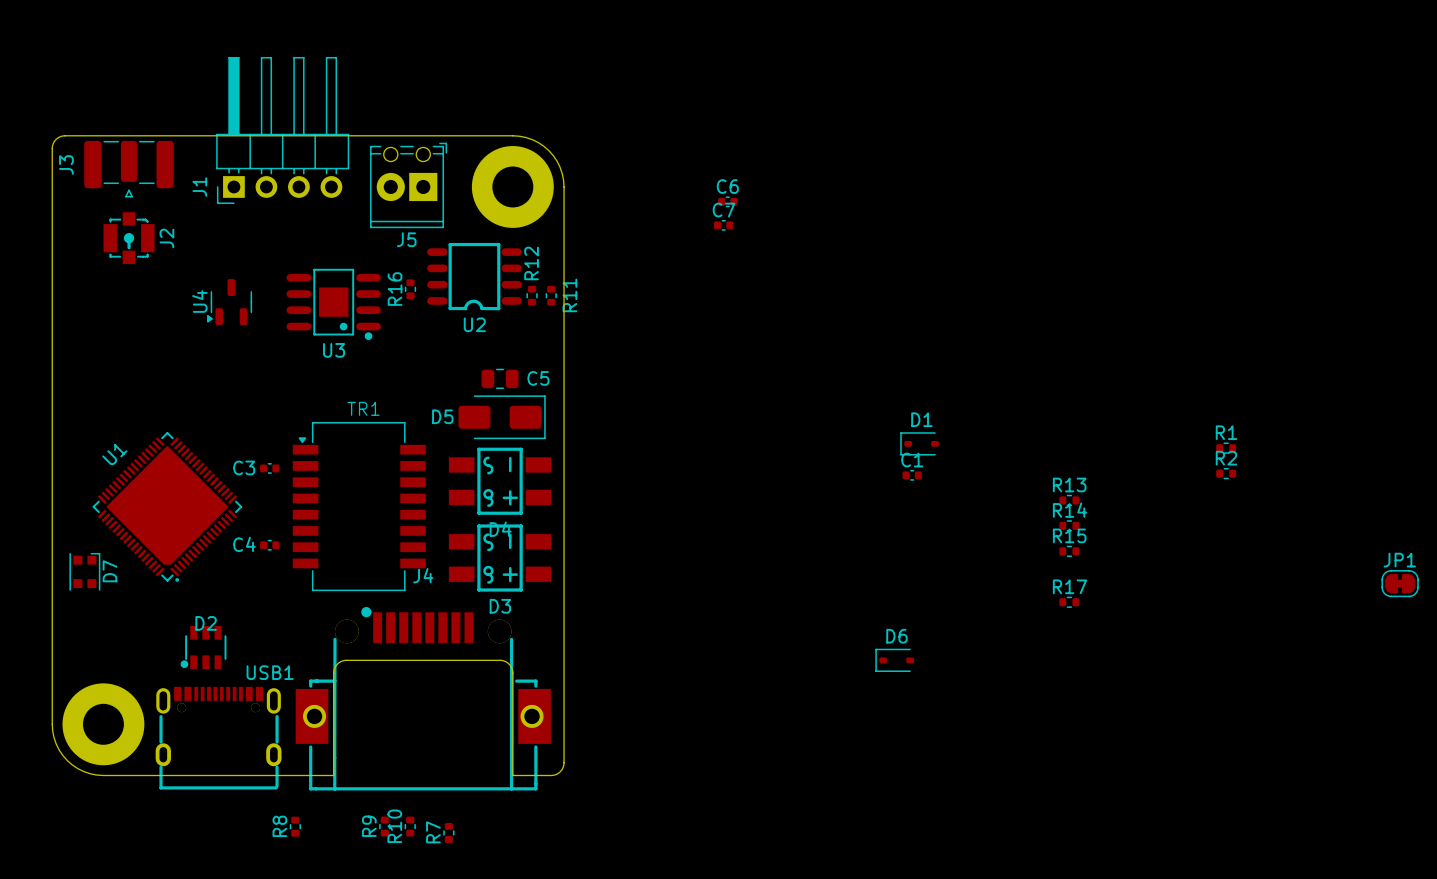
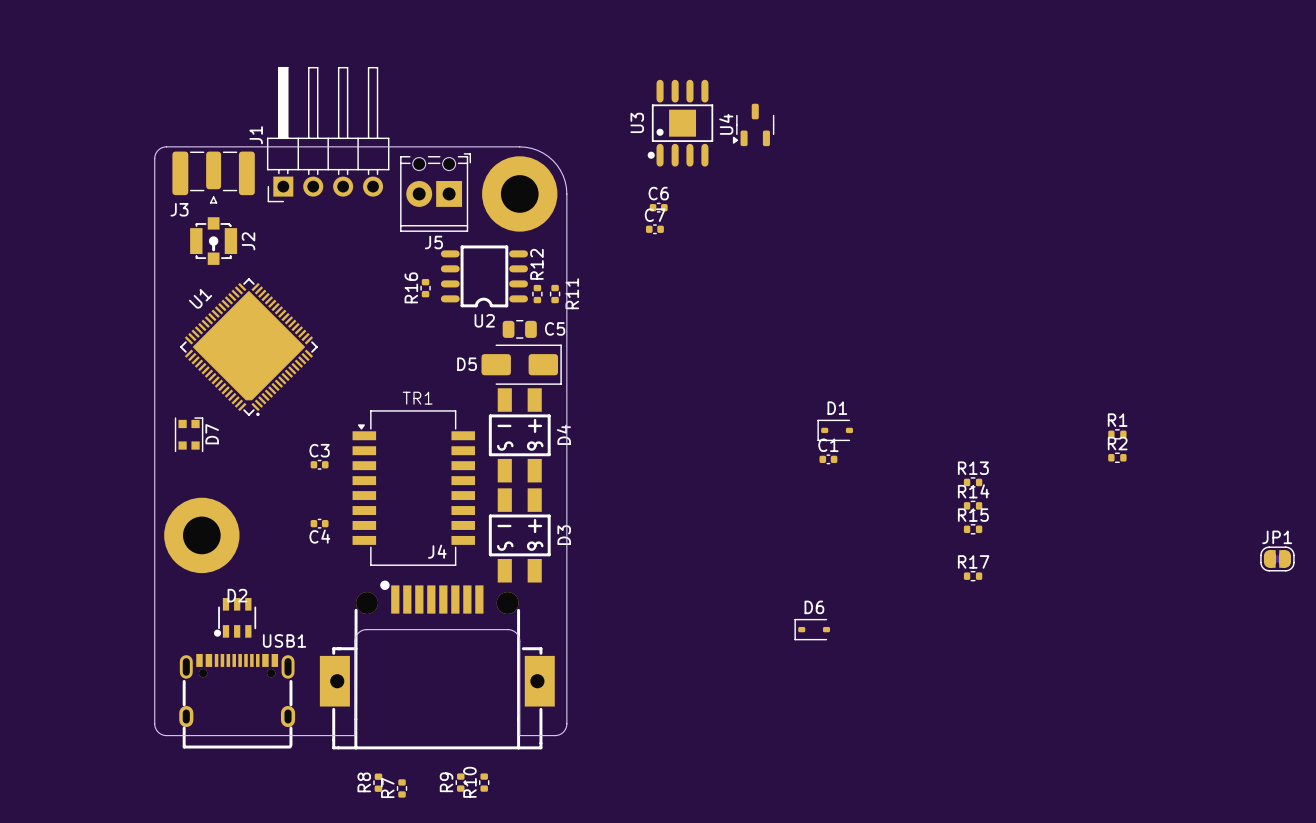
J1 position: (282, 130) -> (328, 134)
board edge: (192, 135) (63, 135) (56, 139) (52, 148) (52, 724) (54, 737) (59, 749) (67, 760) (77, 768) (90, 773) (103, 775) (192, 775) -> (166, 146) (158, 150) (154, 158) (154, 723) (158, 732) (166, 735)
board edge: (512, 135) (526, 137) (543, 146) (557, 161) (563, 180) (564, 762) (562, 769) (556, 774) (512, 775) (512, 671) (508, 663) (500, 660) -> (460, 146) (519, 146) (537, 150) (548, 156) (557, 165) (563, 175) (566, 187) (566, 723) (564, 731) (556, 735) (519, 735) (519, 641) (515, 632) (507, 629) (449, 629)
J3 name rotation: 0° (66, 165) -> 90° clockwise (179, 209)
J3 name position: J3 (66, 165) -> J3 (179, 209)
J3 position: (129, 169) -> (213, 177)
J5 position: (408, 185) -> (435, 192)
part position: (512, 186) -> (519, 193)
J1 name position: J1 (199, 187) -> J1 (256, 135)
J2 position: (129, 238) -> (213, 241)
U2 position: (474, 277) -> (484, 277)
R16 position: (410, 289) -> (425, 288)
R12 position: (532, 295) -> (537, 294)
R11 position: (551, 295) -> (555, 294)
U4 position: (229, 302) -> (753, 124)
U3 rotation: 0° (333, 304) -> 90° clockwise (680, 123)
U3 position: (333, 304) -> (680, 123)
C5 position: (500, 378) -> (519, 329)
D5 position: (502, 417) -> (521, 364)
C3 name position: C3 (244, 467) -> C3 (319, 450)
C3 position: (269, 468) -> (319, 464)
D4 rotation: 0° (500, 481) -> 90° counterclockwise (519, 435)
D4 position: (500, 481) -> (519, 435)
U1 position: (167, 506) -> (248, 347)
TR1 position: (359, 506) -> (413, 488)
C4 name position: C4 (244, 544) -> C4 (319, 536)
C4 position: (269, 545) -> (319, 523)
D3 rotation: 0° (500, 557) -> 90° counterclockwise (519, 535)
D3 position: (500, 557) -> (519, 535)
D7 position: (84, 571) -> (189, 434)
D2 position: (203, 647) -> (235, 617)
board edge: (410, 660) (345, 660) (335, 666) (333, 673) (333, 775) -> (366, 629) (359, 632) (354, 640) (354, 735) (296, 735)
J4 position: (423, 698) -> (437, 664)
part position: (103, 724) -> (201, 535)
USB1 position: (218, 738) -> (237, 701)
R8 position: (295, 826) -> (378, 782)
R9 position: (384, 826) -> (460, 782)
R10 position: (410, 826) -> (484, 782)

